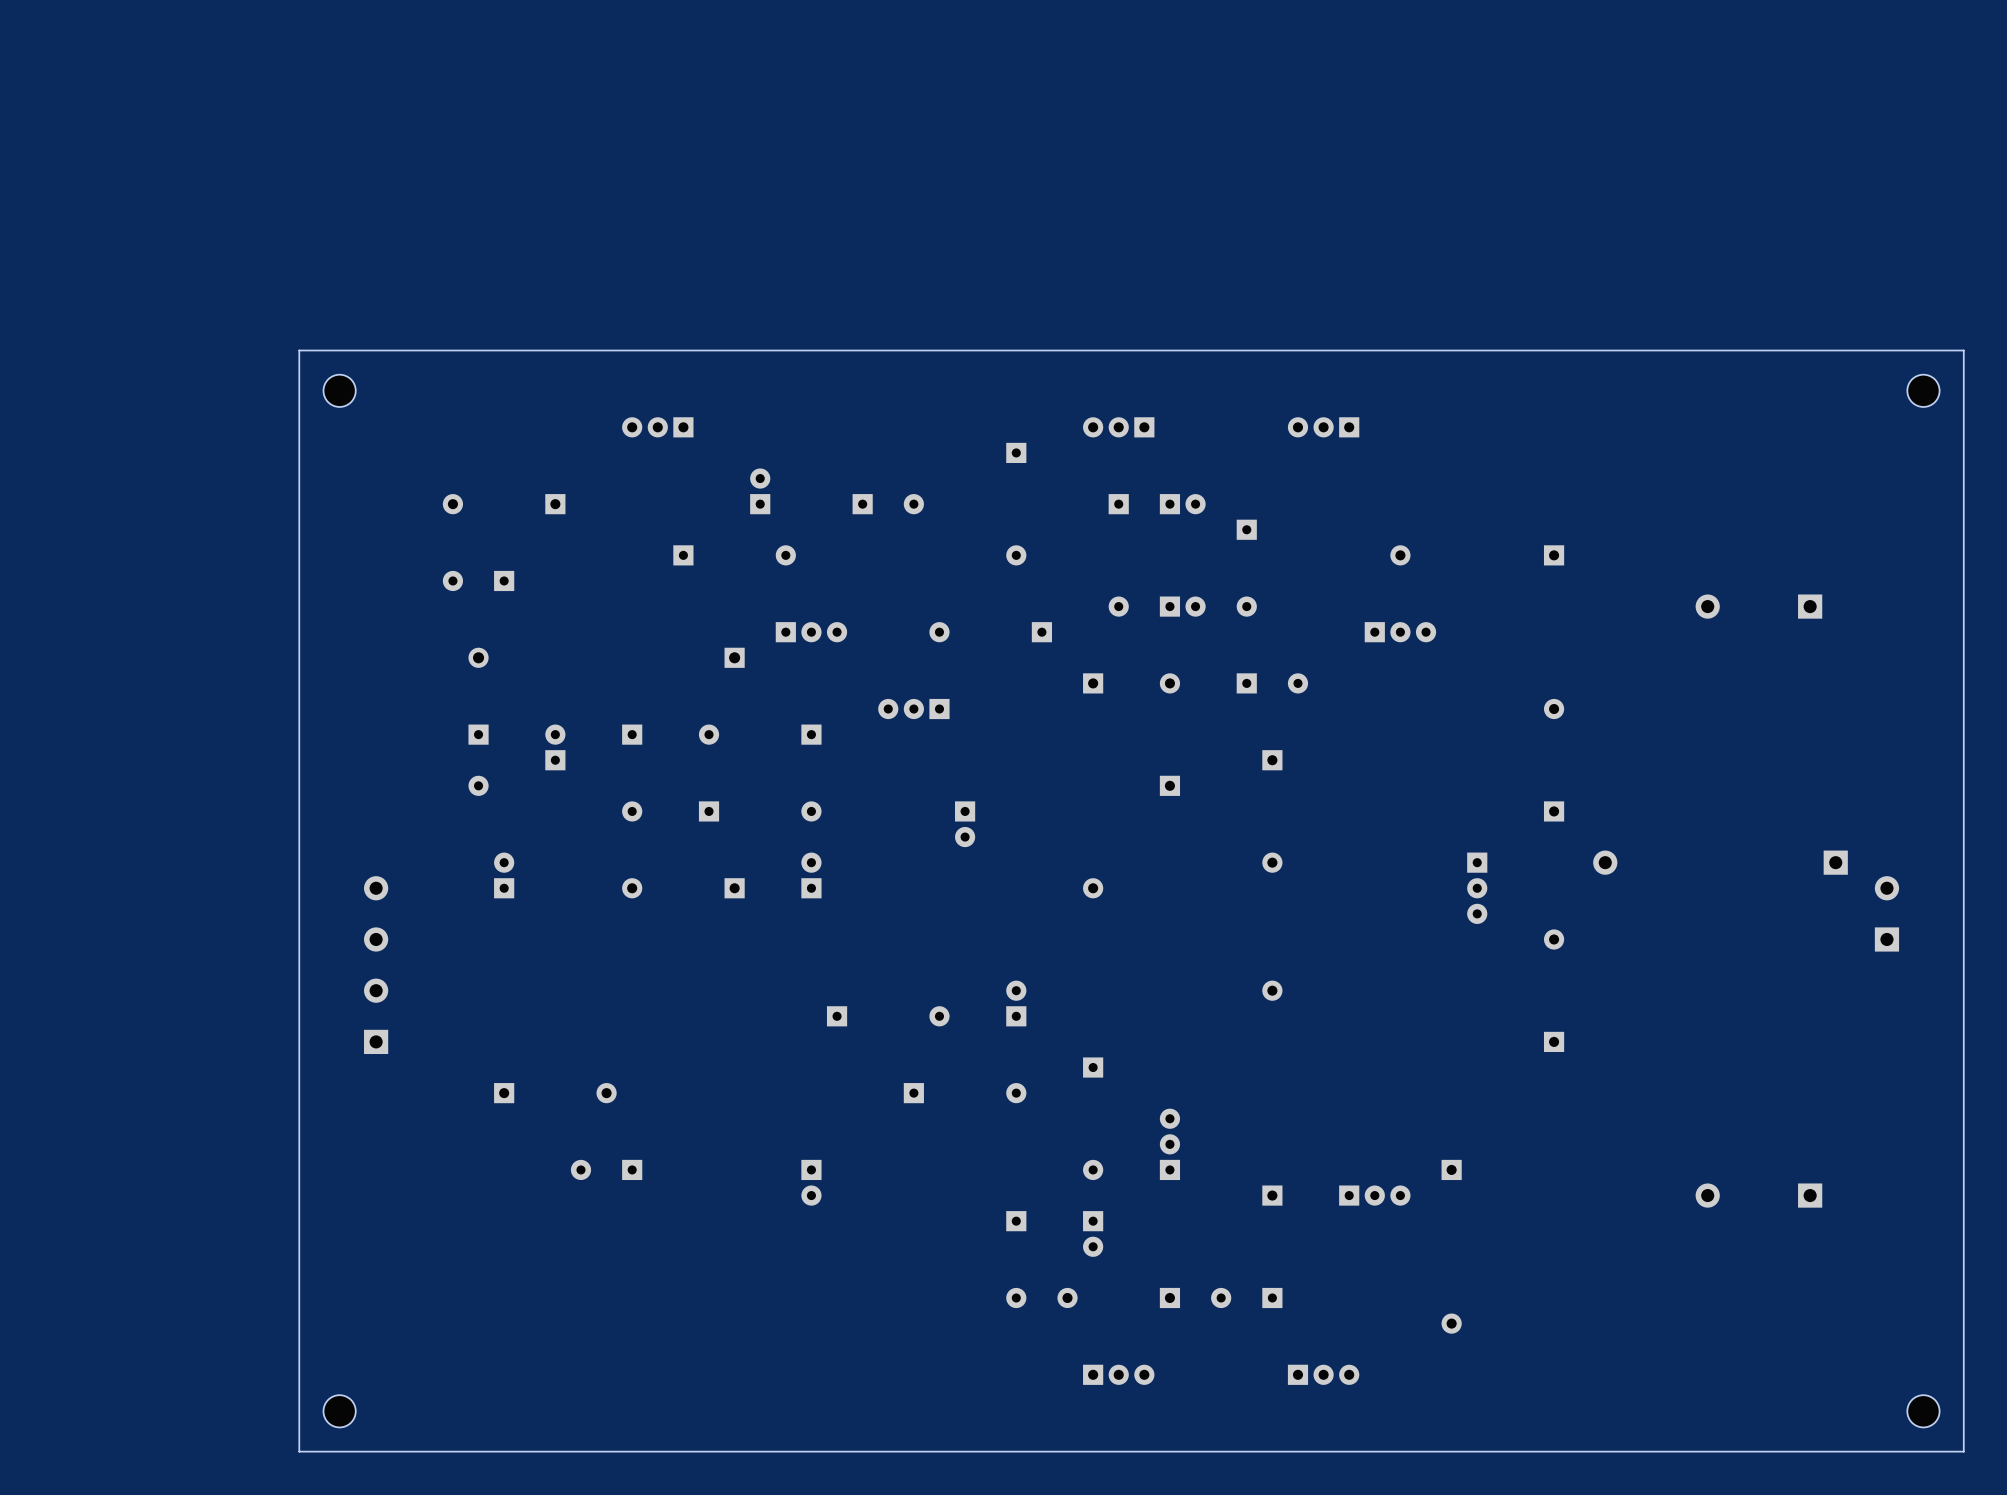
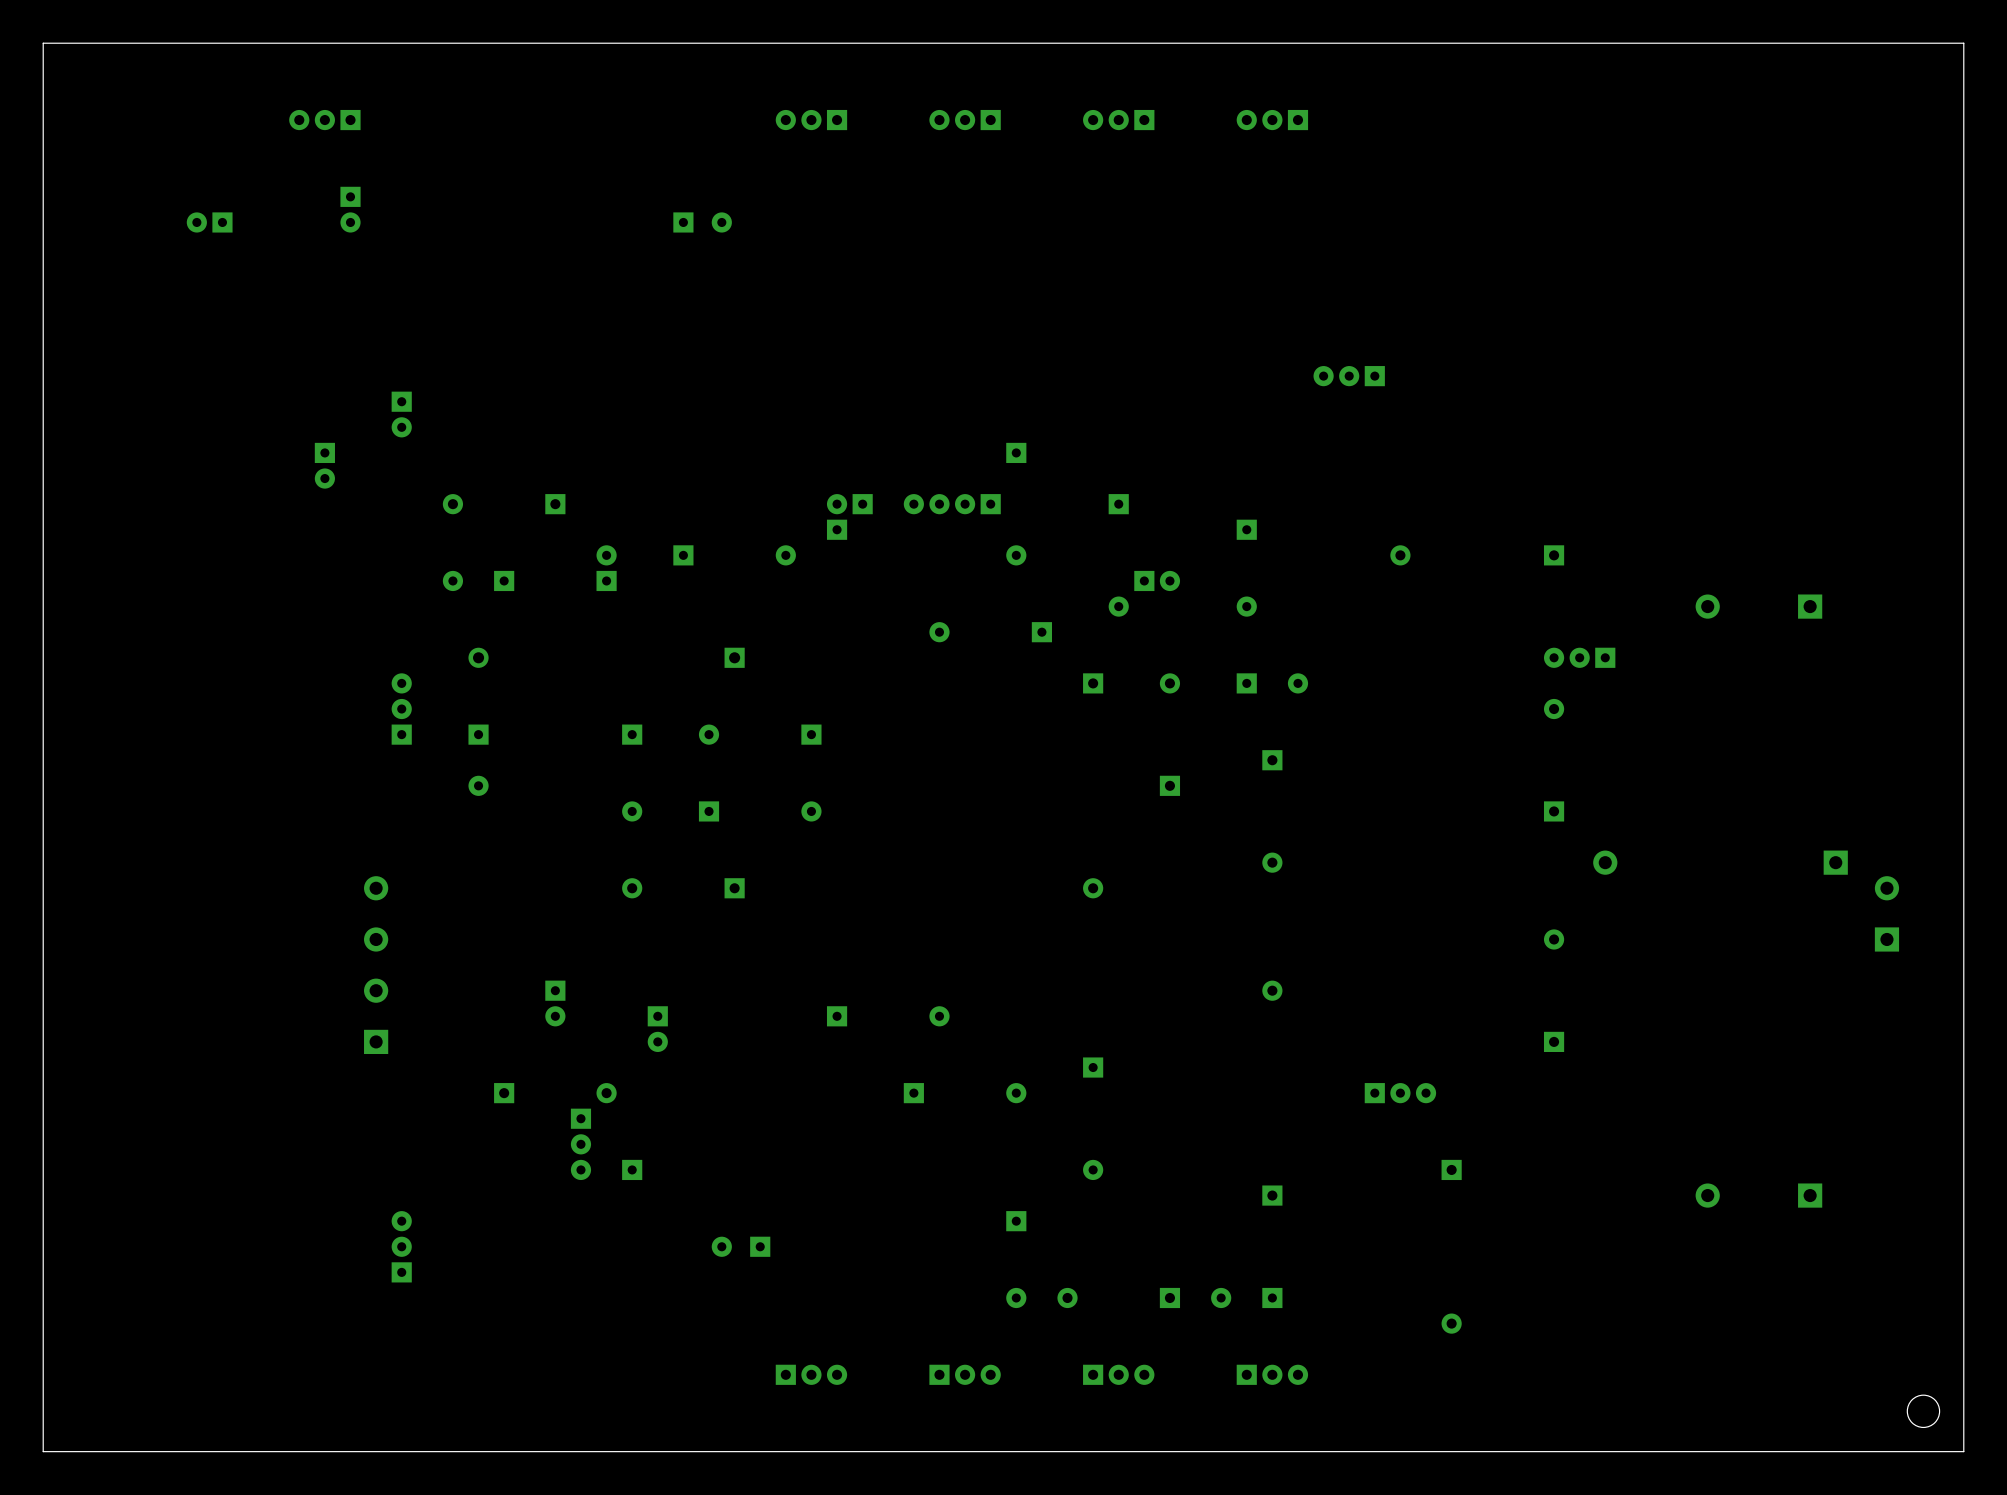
part: none -> (324, 120)
part: none -> (811, 120)
part: none -> (965, 120)
part: none -> (1118, 120)
part: none -> (1272, 120)
part: none -> (350, 209)
part: none -> (209, 222)
part: none -> (702, 222)
board edge: (1963, 350) (299, 350) (299, 1451) -> (1963, 350) (1963, 43) (43, 43) (43, 1451) (299, 1451)
part: none -> (1349, 376)
hole: (339, 390) -> none
hole: (1923, 390) -> none
part: none -> (401, 414)
part: (657, 427) -> none
part: (1118, 427) -> none
part: (1323, 427) -> none
part: none -> (324, 465)
part position: (760, 491) -> (837, 516)
part: none -> (965, 504)
part: (1182, 504) -> none
part: none -> (606, 568)
part position: (1182, 606) -> (1157, 580)
part: (811, 632) -> none
part: (1400, 632) -> none
part: none -> (1579, 657)
part: none -> (401, 709)
part: (913, 709) -> none
part: (555, 747) -> none
part: (965, 824) -> none
part: (504, 875) -> none
part: (811, 875) -> none
part: (1477, 888) -> none
part: none -> (555, 1003)
part: (1016, 1003) -> none
part: none -> (657, 1029)
part: none -> (580, 1131)
part: (1169, 1144) -> none
part: (811, 1182) -> none
part position: (1374, 1195) -> (1400, 1093)
part: (1093, 1233) -> none
part: none -> (401, 1246)
part: none -> (741, 1246)
part: none -> (811, 1374)
part: none -> (965, 1374)
part position: (1323, 1374) -> (1272, 1374)
hole: (339, 1411) -> none

